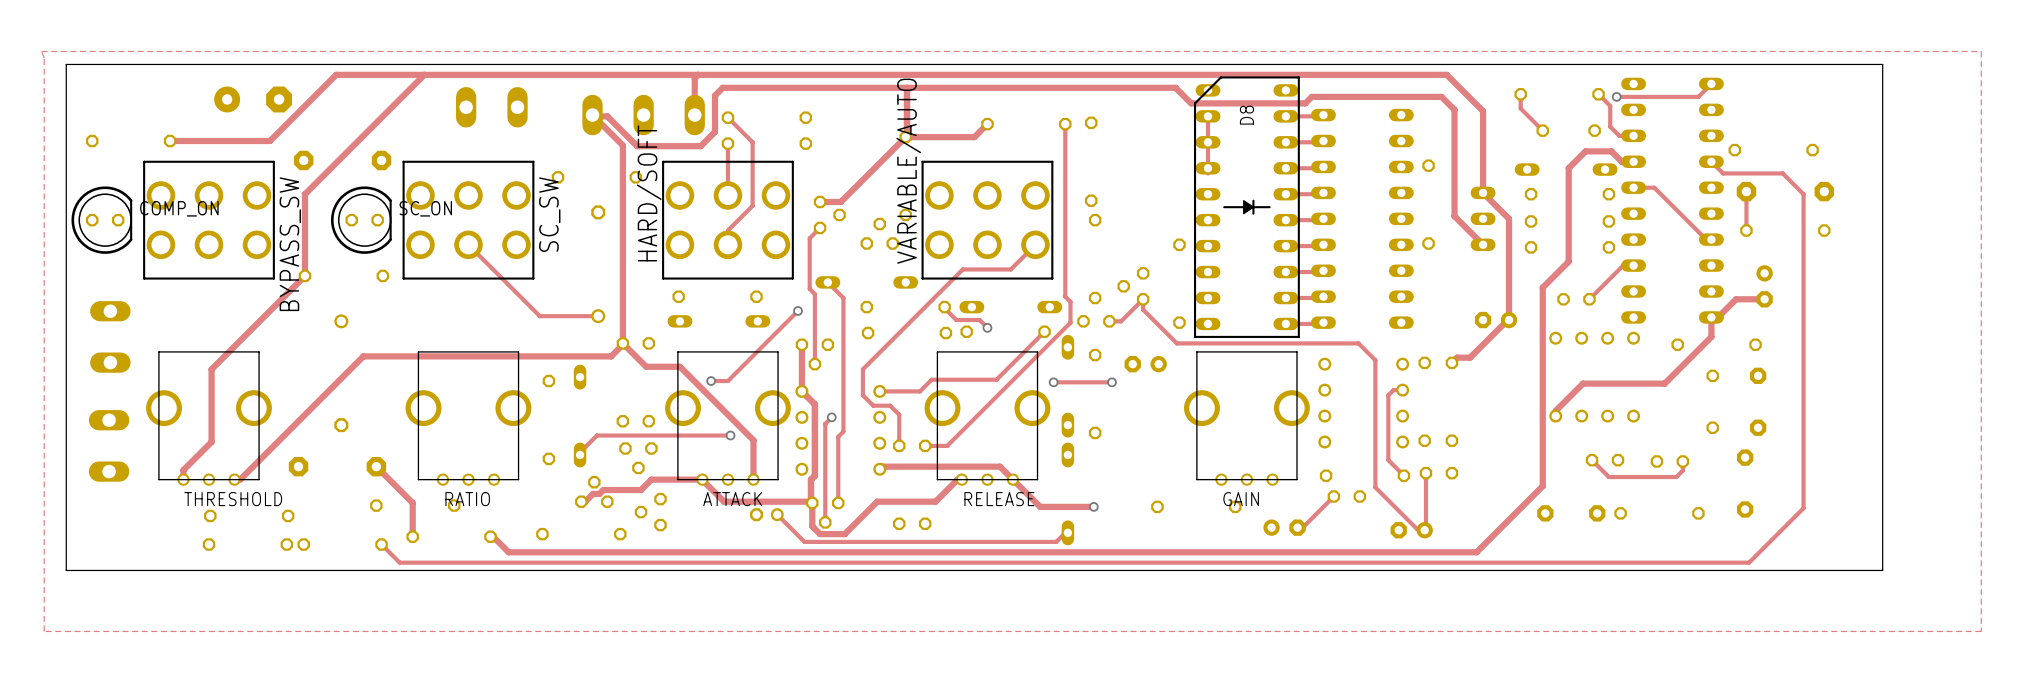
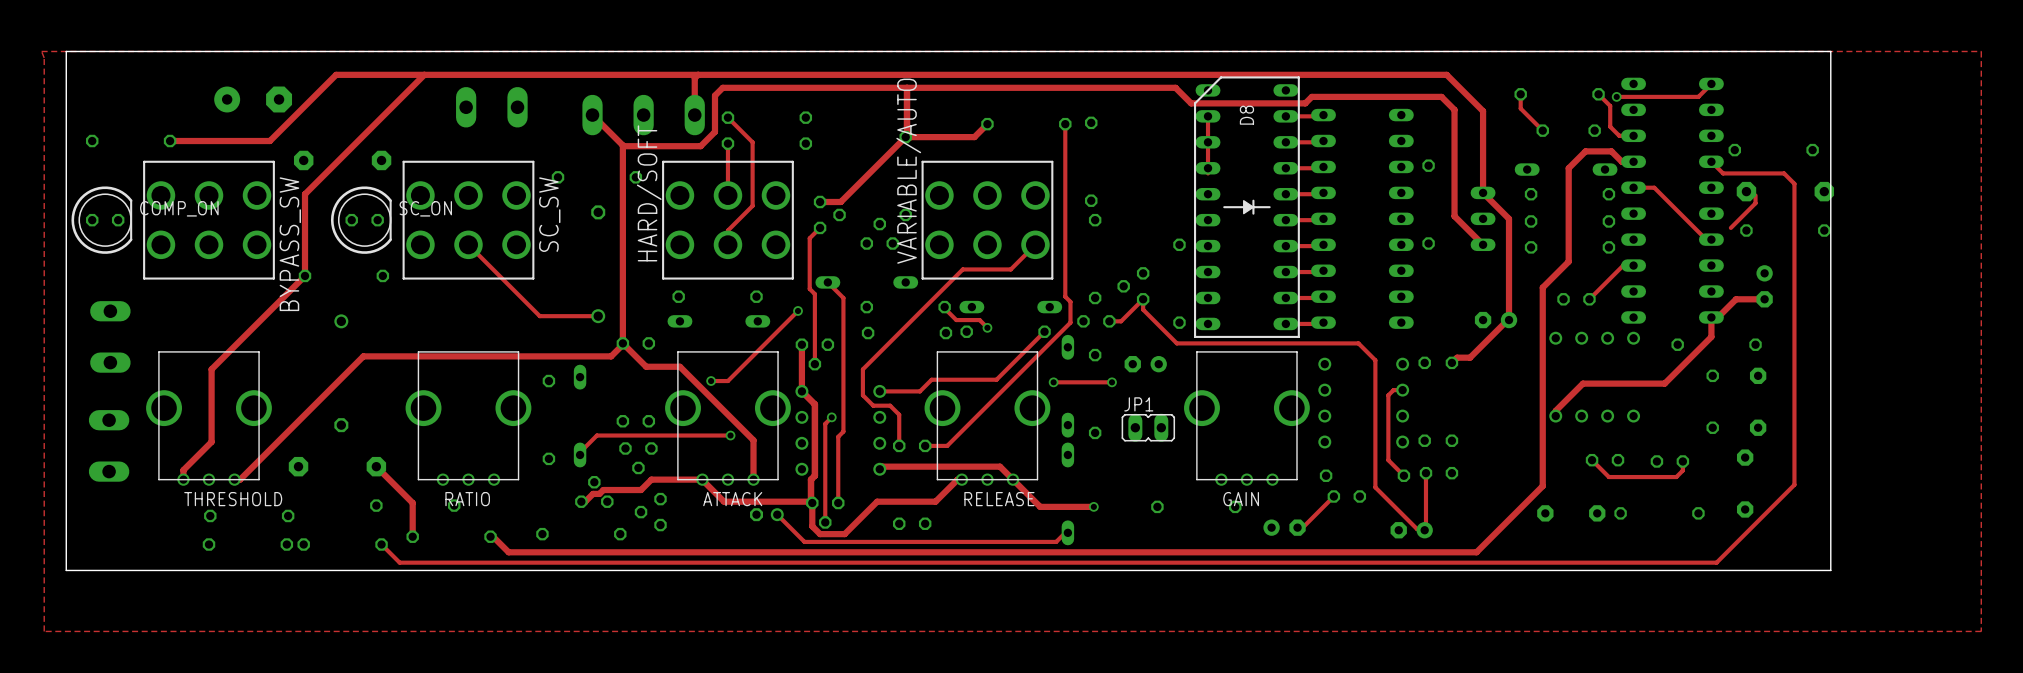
board edge: (66, 64) (1882, 64) (1882, 570) (1830, 570) -> (66, 64) (66, 51) (1830, 51) (1830, 570)
track: (592, 109) (599, 116) (607, 116) (637, 146) -> (622, 145) (637, 146)
track: (1782, 173) (1803, 194) (1803, 508) (1749, 562) (1716, 562) -> (1782, 173) (1794, 183) (1794, 484) (1716, 562)
track: (1746, 191) (1746, 230) -> none
track: none -> (1755, 195) (1755, 203) (1730, 227)
JP1: none -> (1148, 427)

